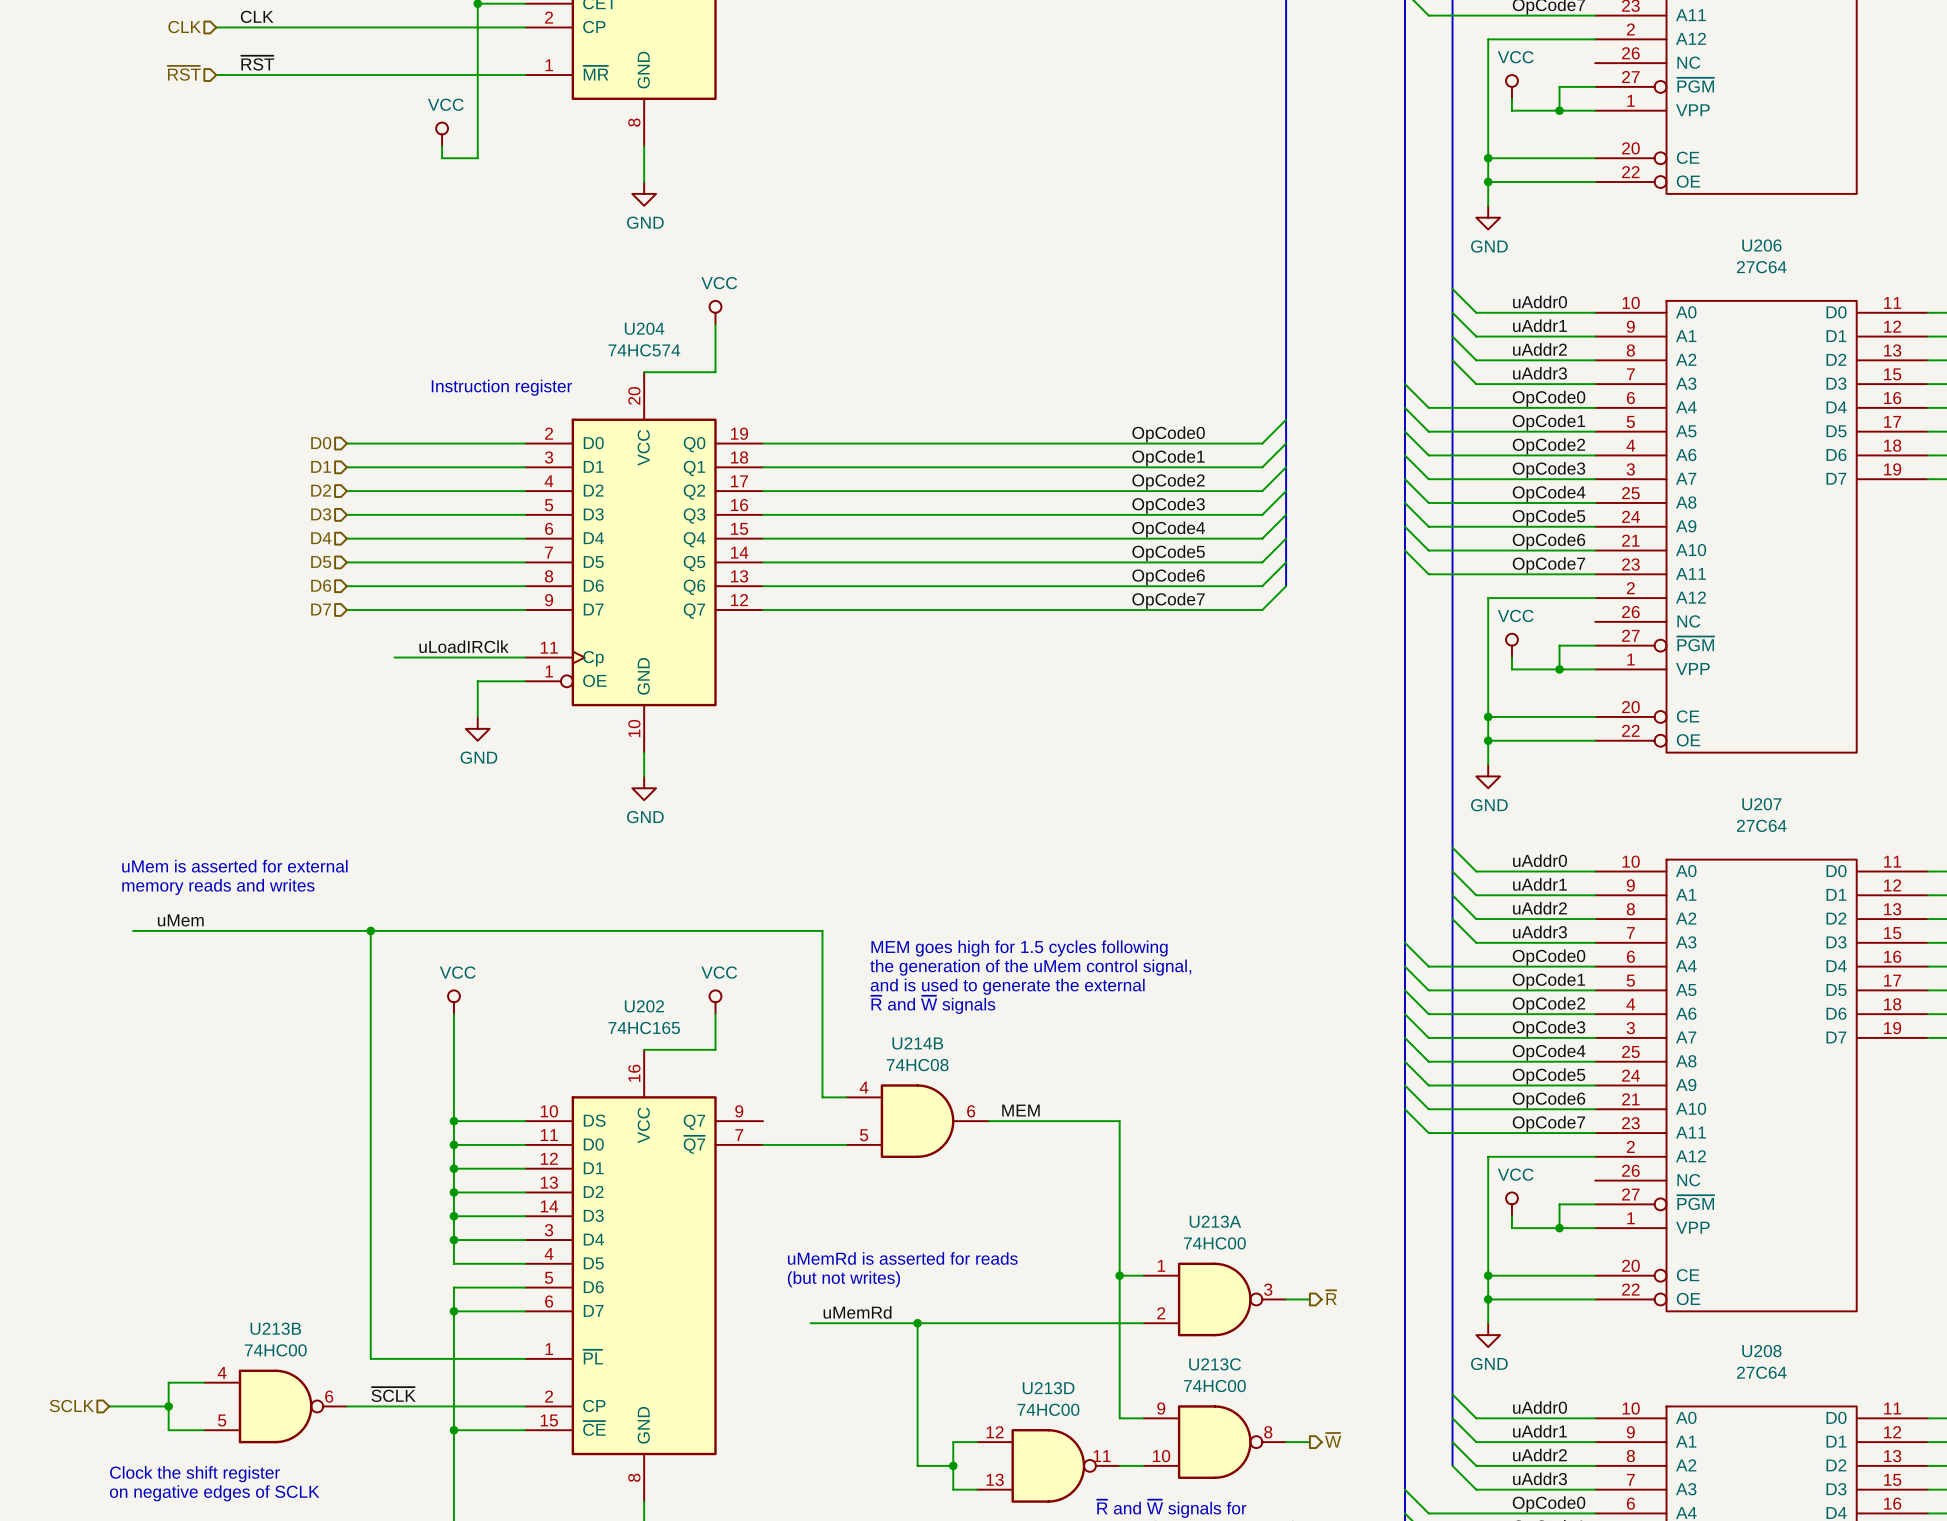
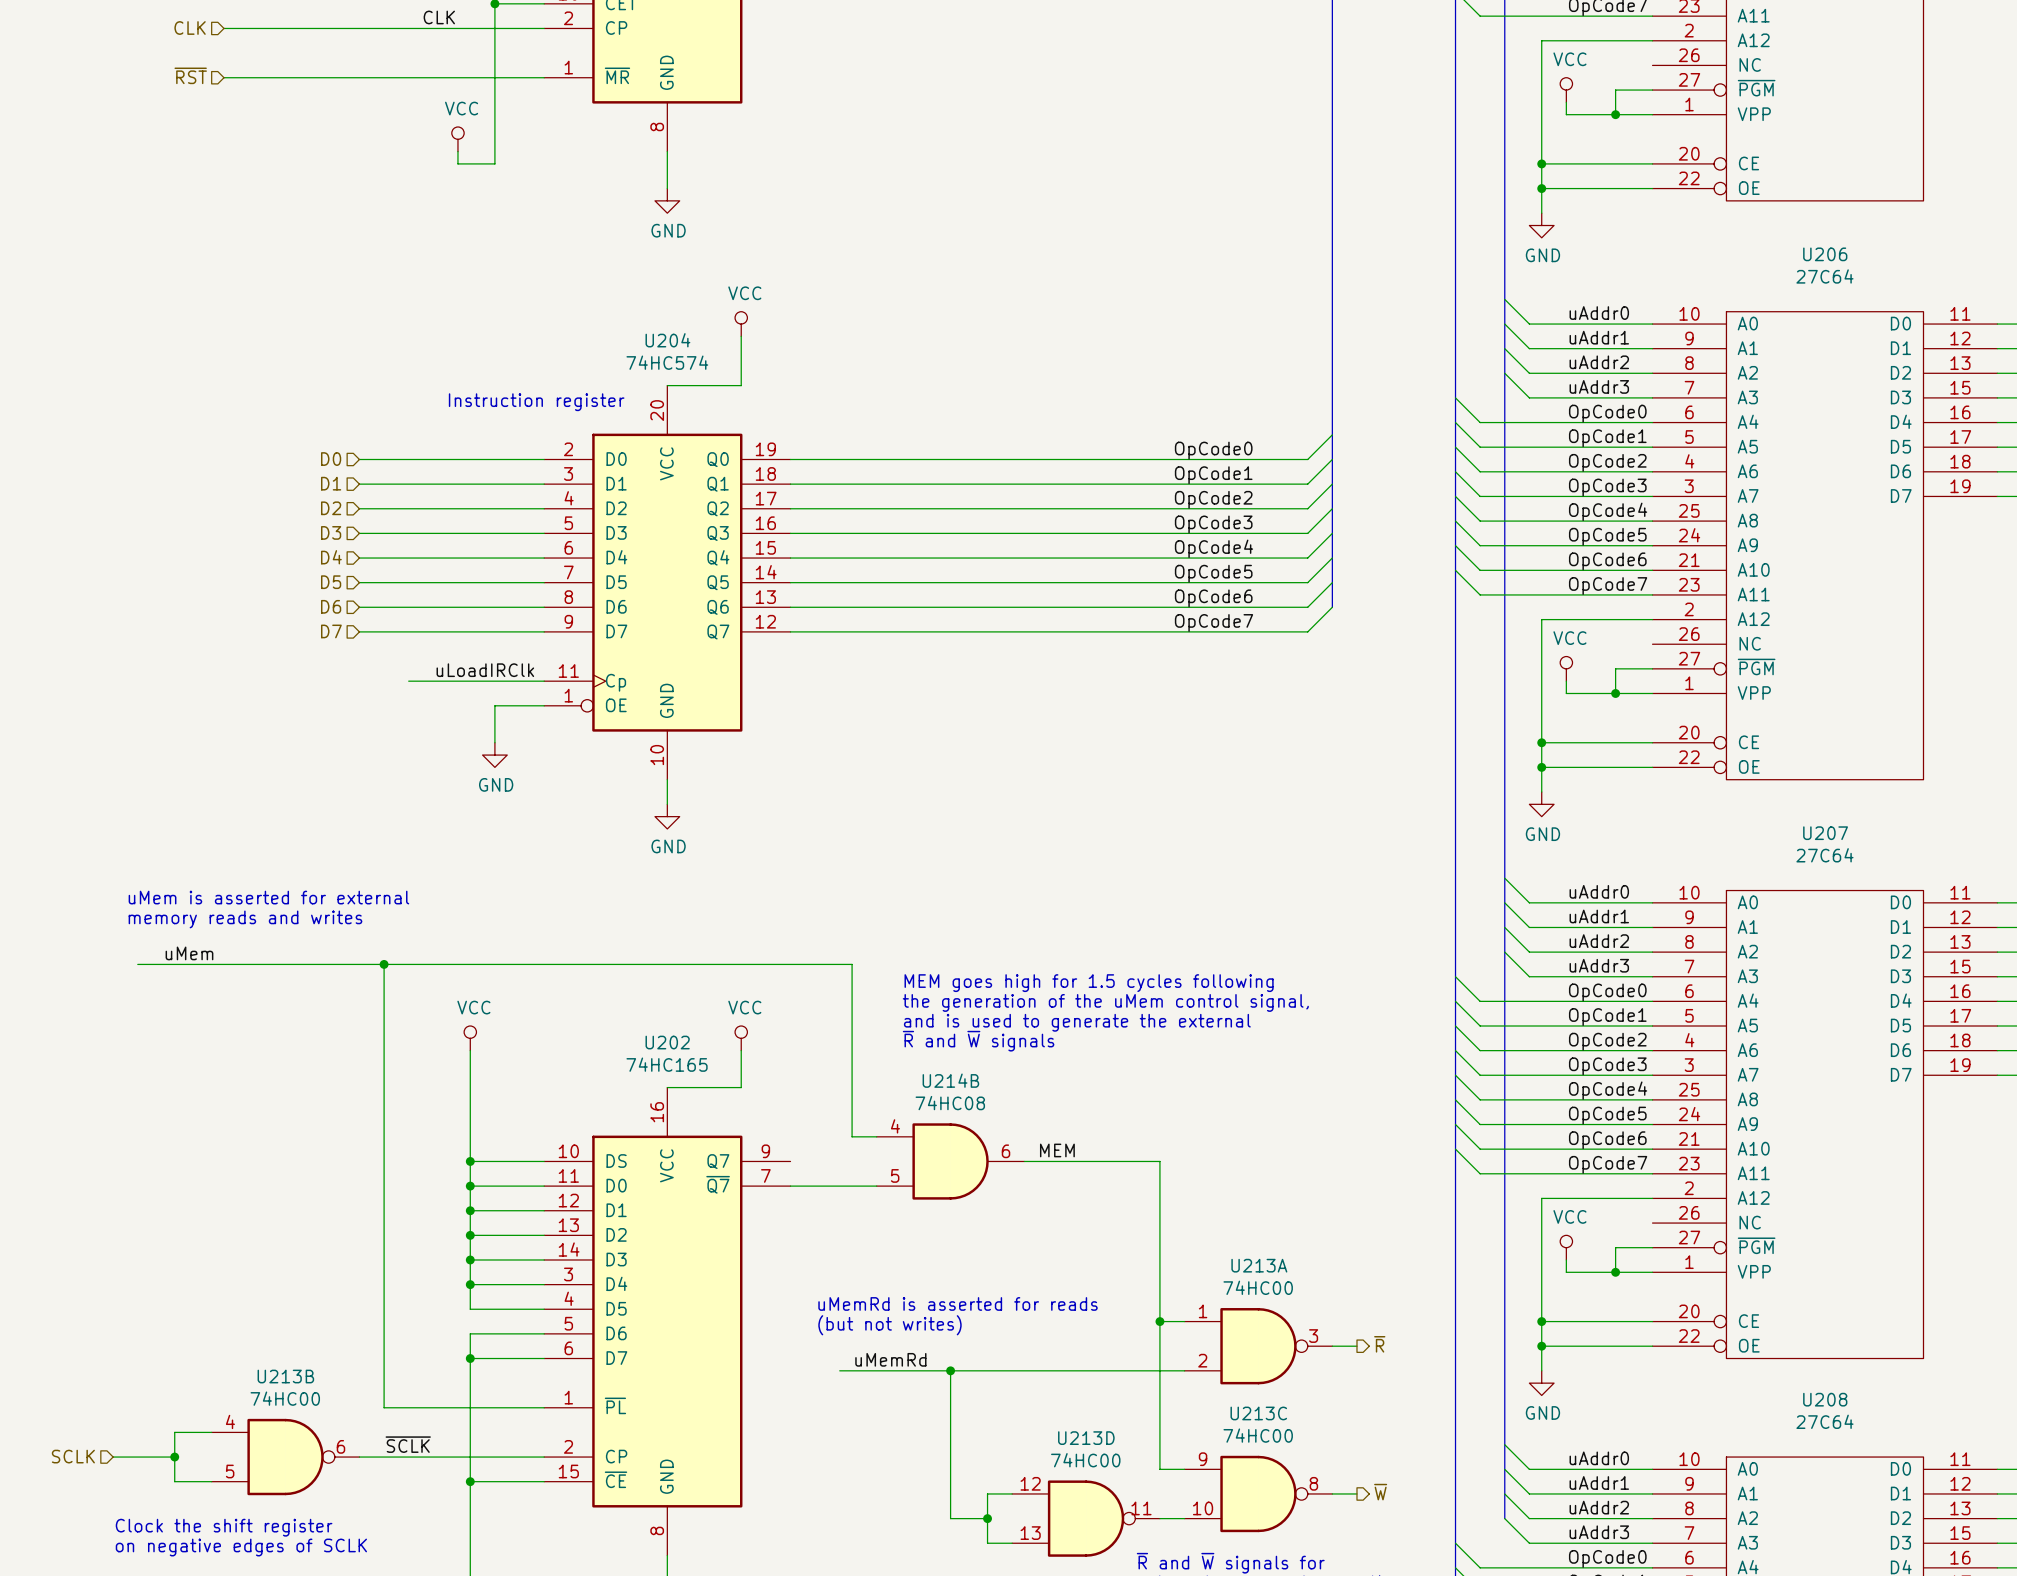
label position: CLK (257, 16) -> CLK (439, 17)
label: ~{RST} (257, 63) -> none

